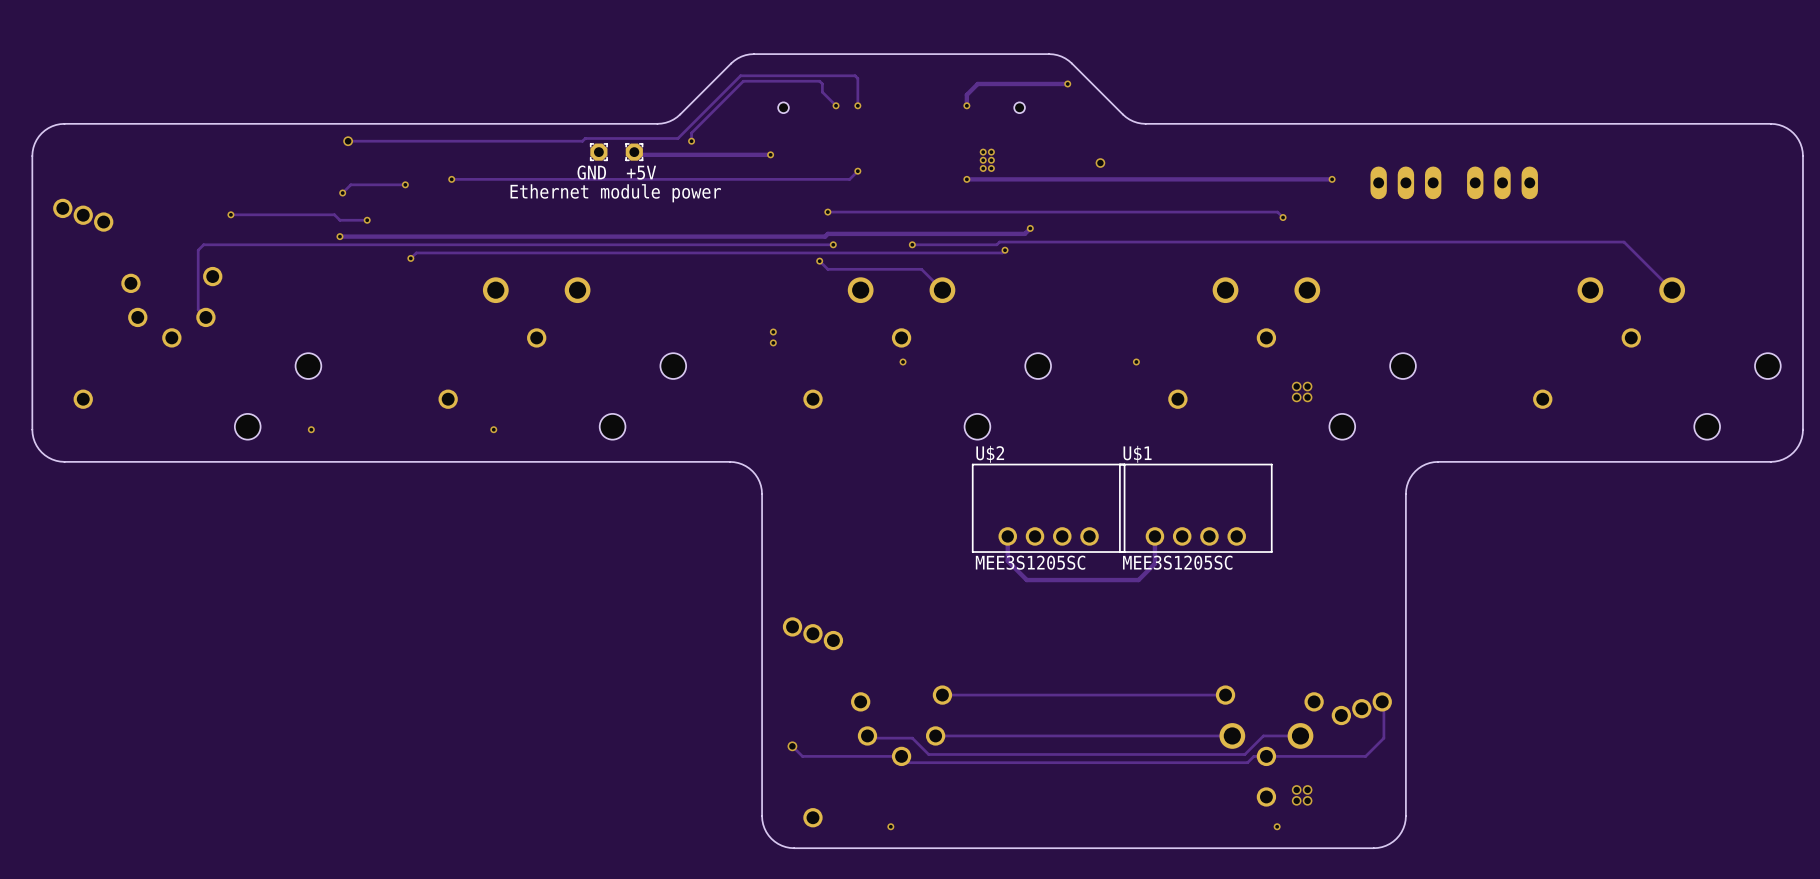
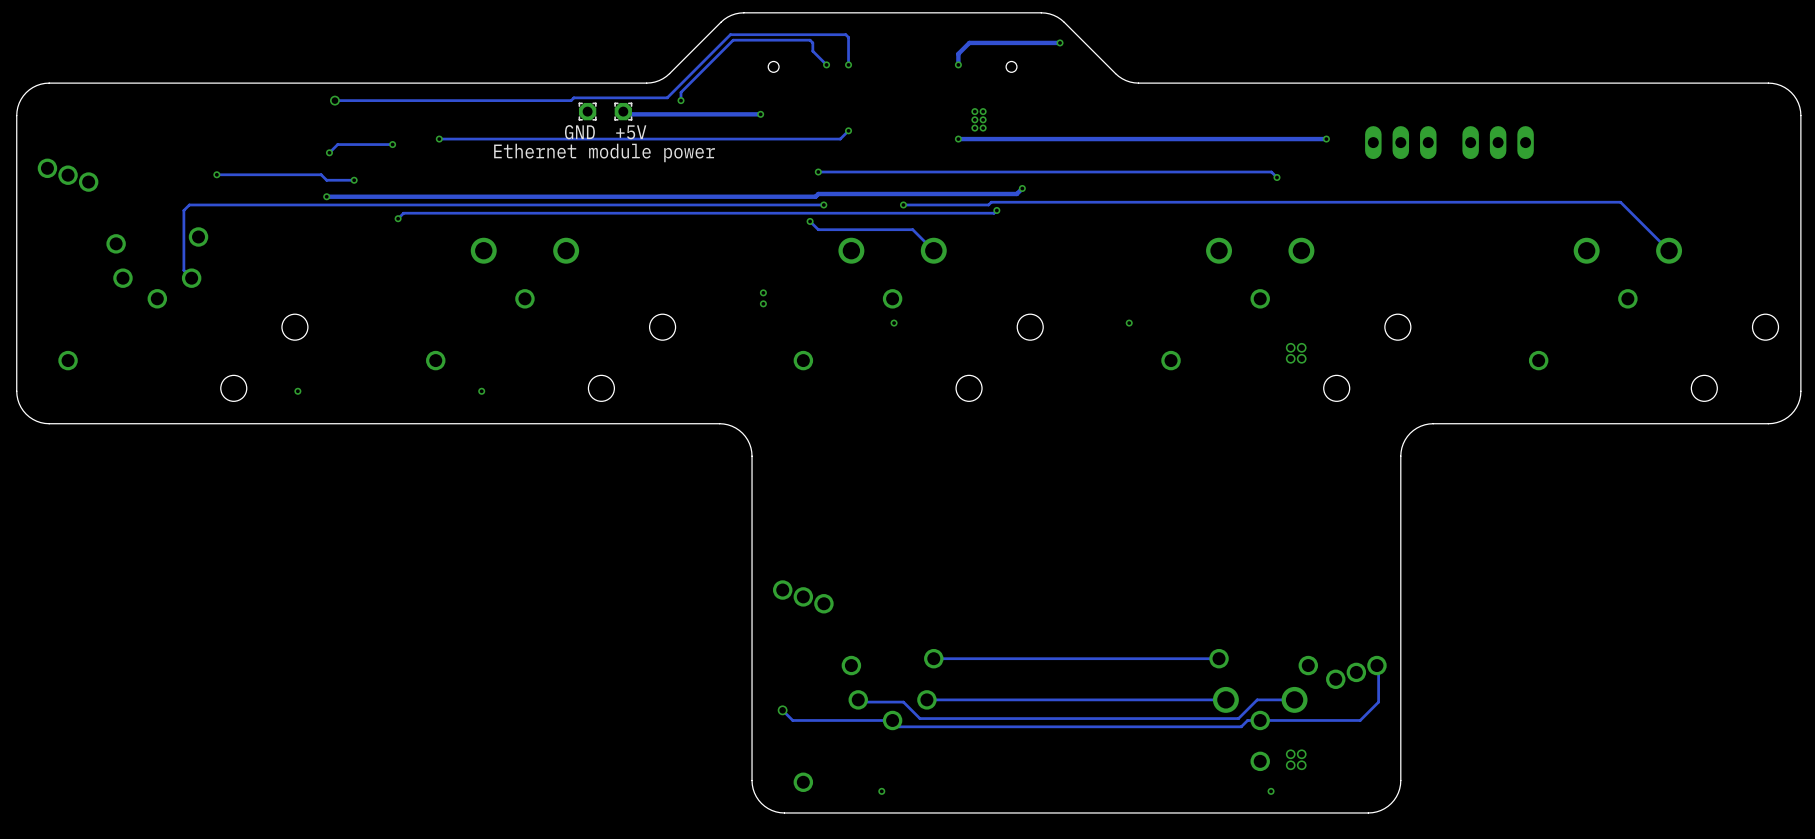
via: (1100, 163) -> none
U$2: MEE3S1205SC (1048, 508) -> none
U$1: MEE3S1205SC (1195, 508) -> none
track: (1154, 536) (1154, 563) (1138, 580) (1026, 580) (1007, 560) (1007, 536) -> none

